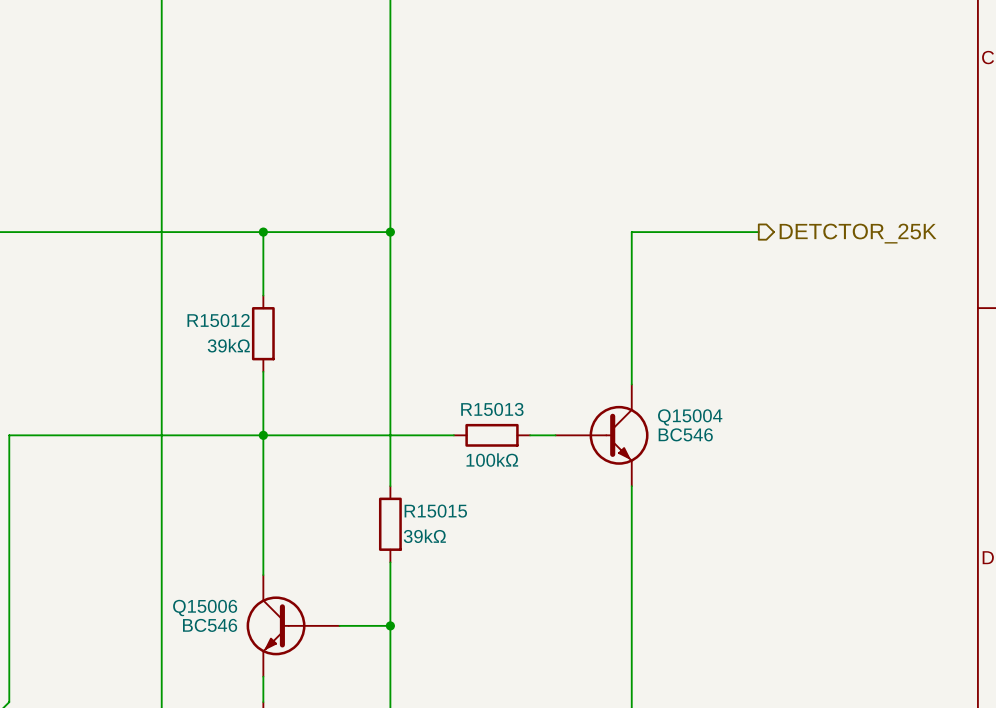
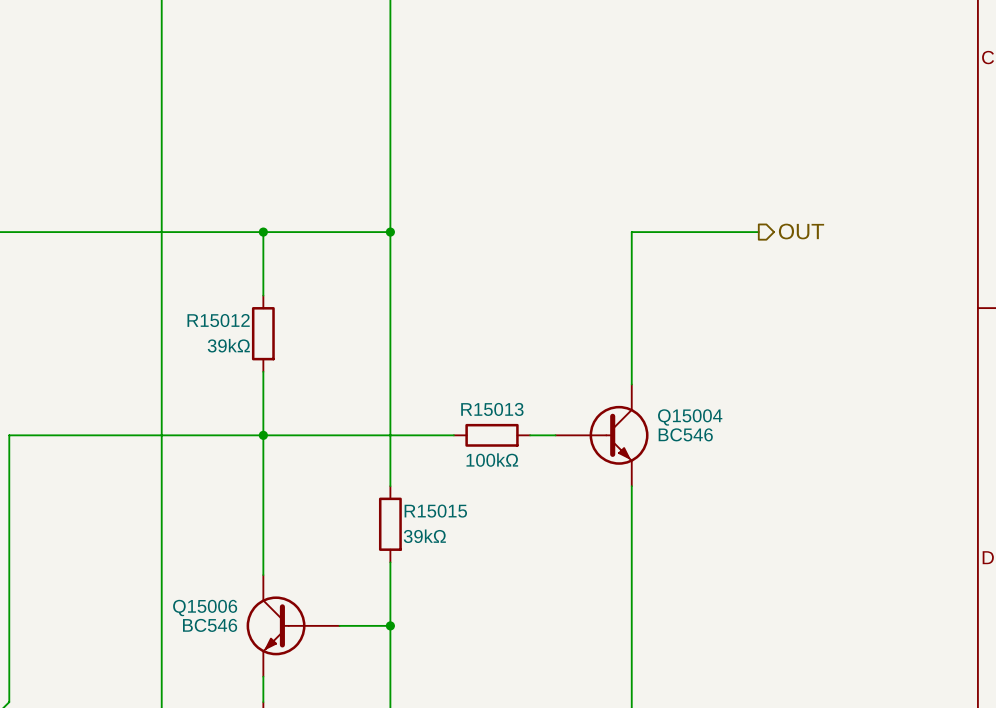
hierarchical label: DETCTOR_25K (858, 233) -> OUT (801, 231)

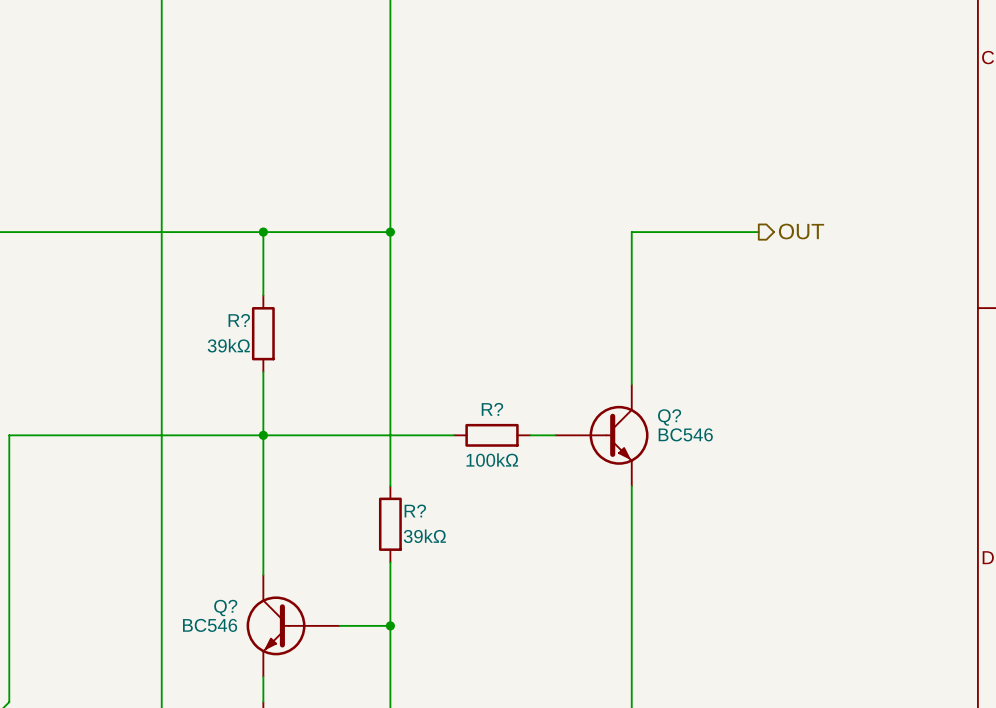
R15012 name: R15012 (218, 320) -> R? (239, 320)
R15013 name: R15013 (492, 409) -> R? (492, 409)
Q15004 name: Q15004 (690, 417) -> Q? (669, 417)
R15015 name: R15015 (435, 511) -> R? (415, 510)
Q15006 name: Q15006 (205, 608) -> Q? (225, 608)

